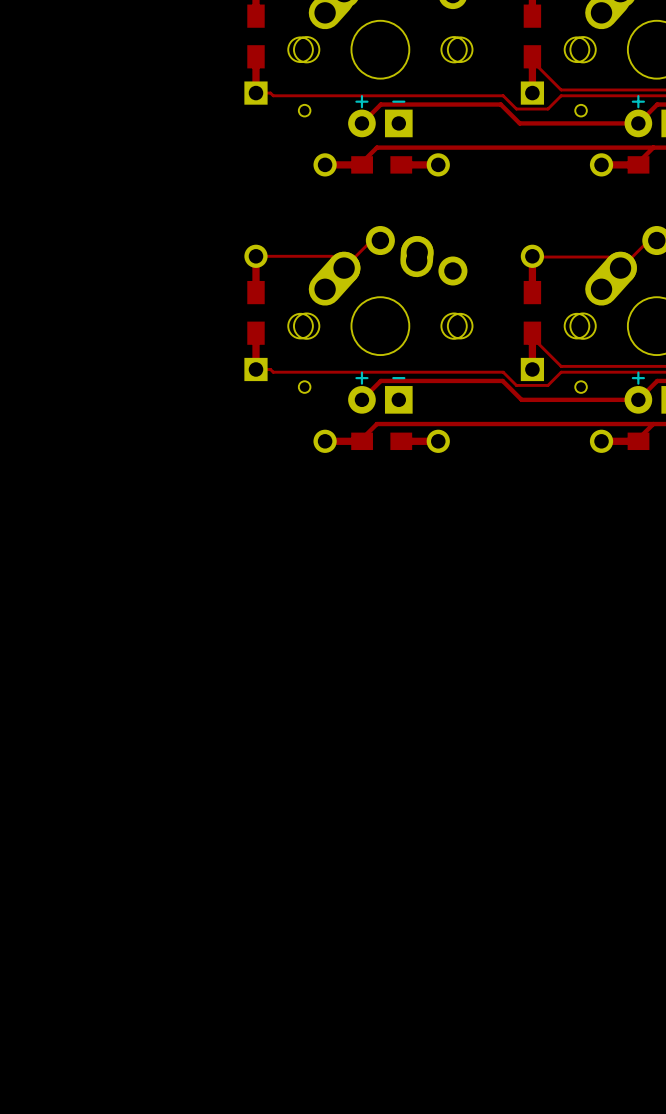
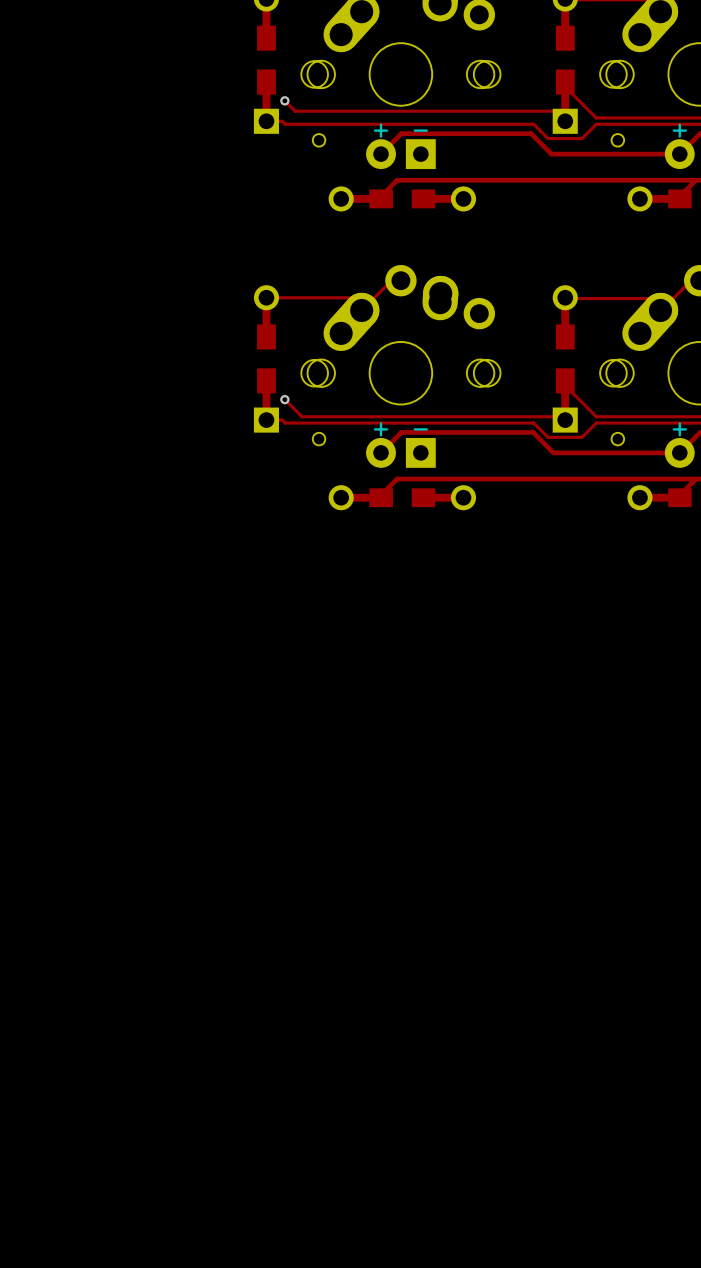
track: none -> (284, 100) (295, 111) (555, 111) (565, 121)
via: none -> (284, 100)
track: none -> (284, 399) (301, 416) (561, 416) (565, 420)
via: none -> (284, 399)

